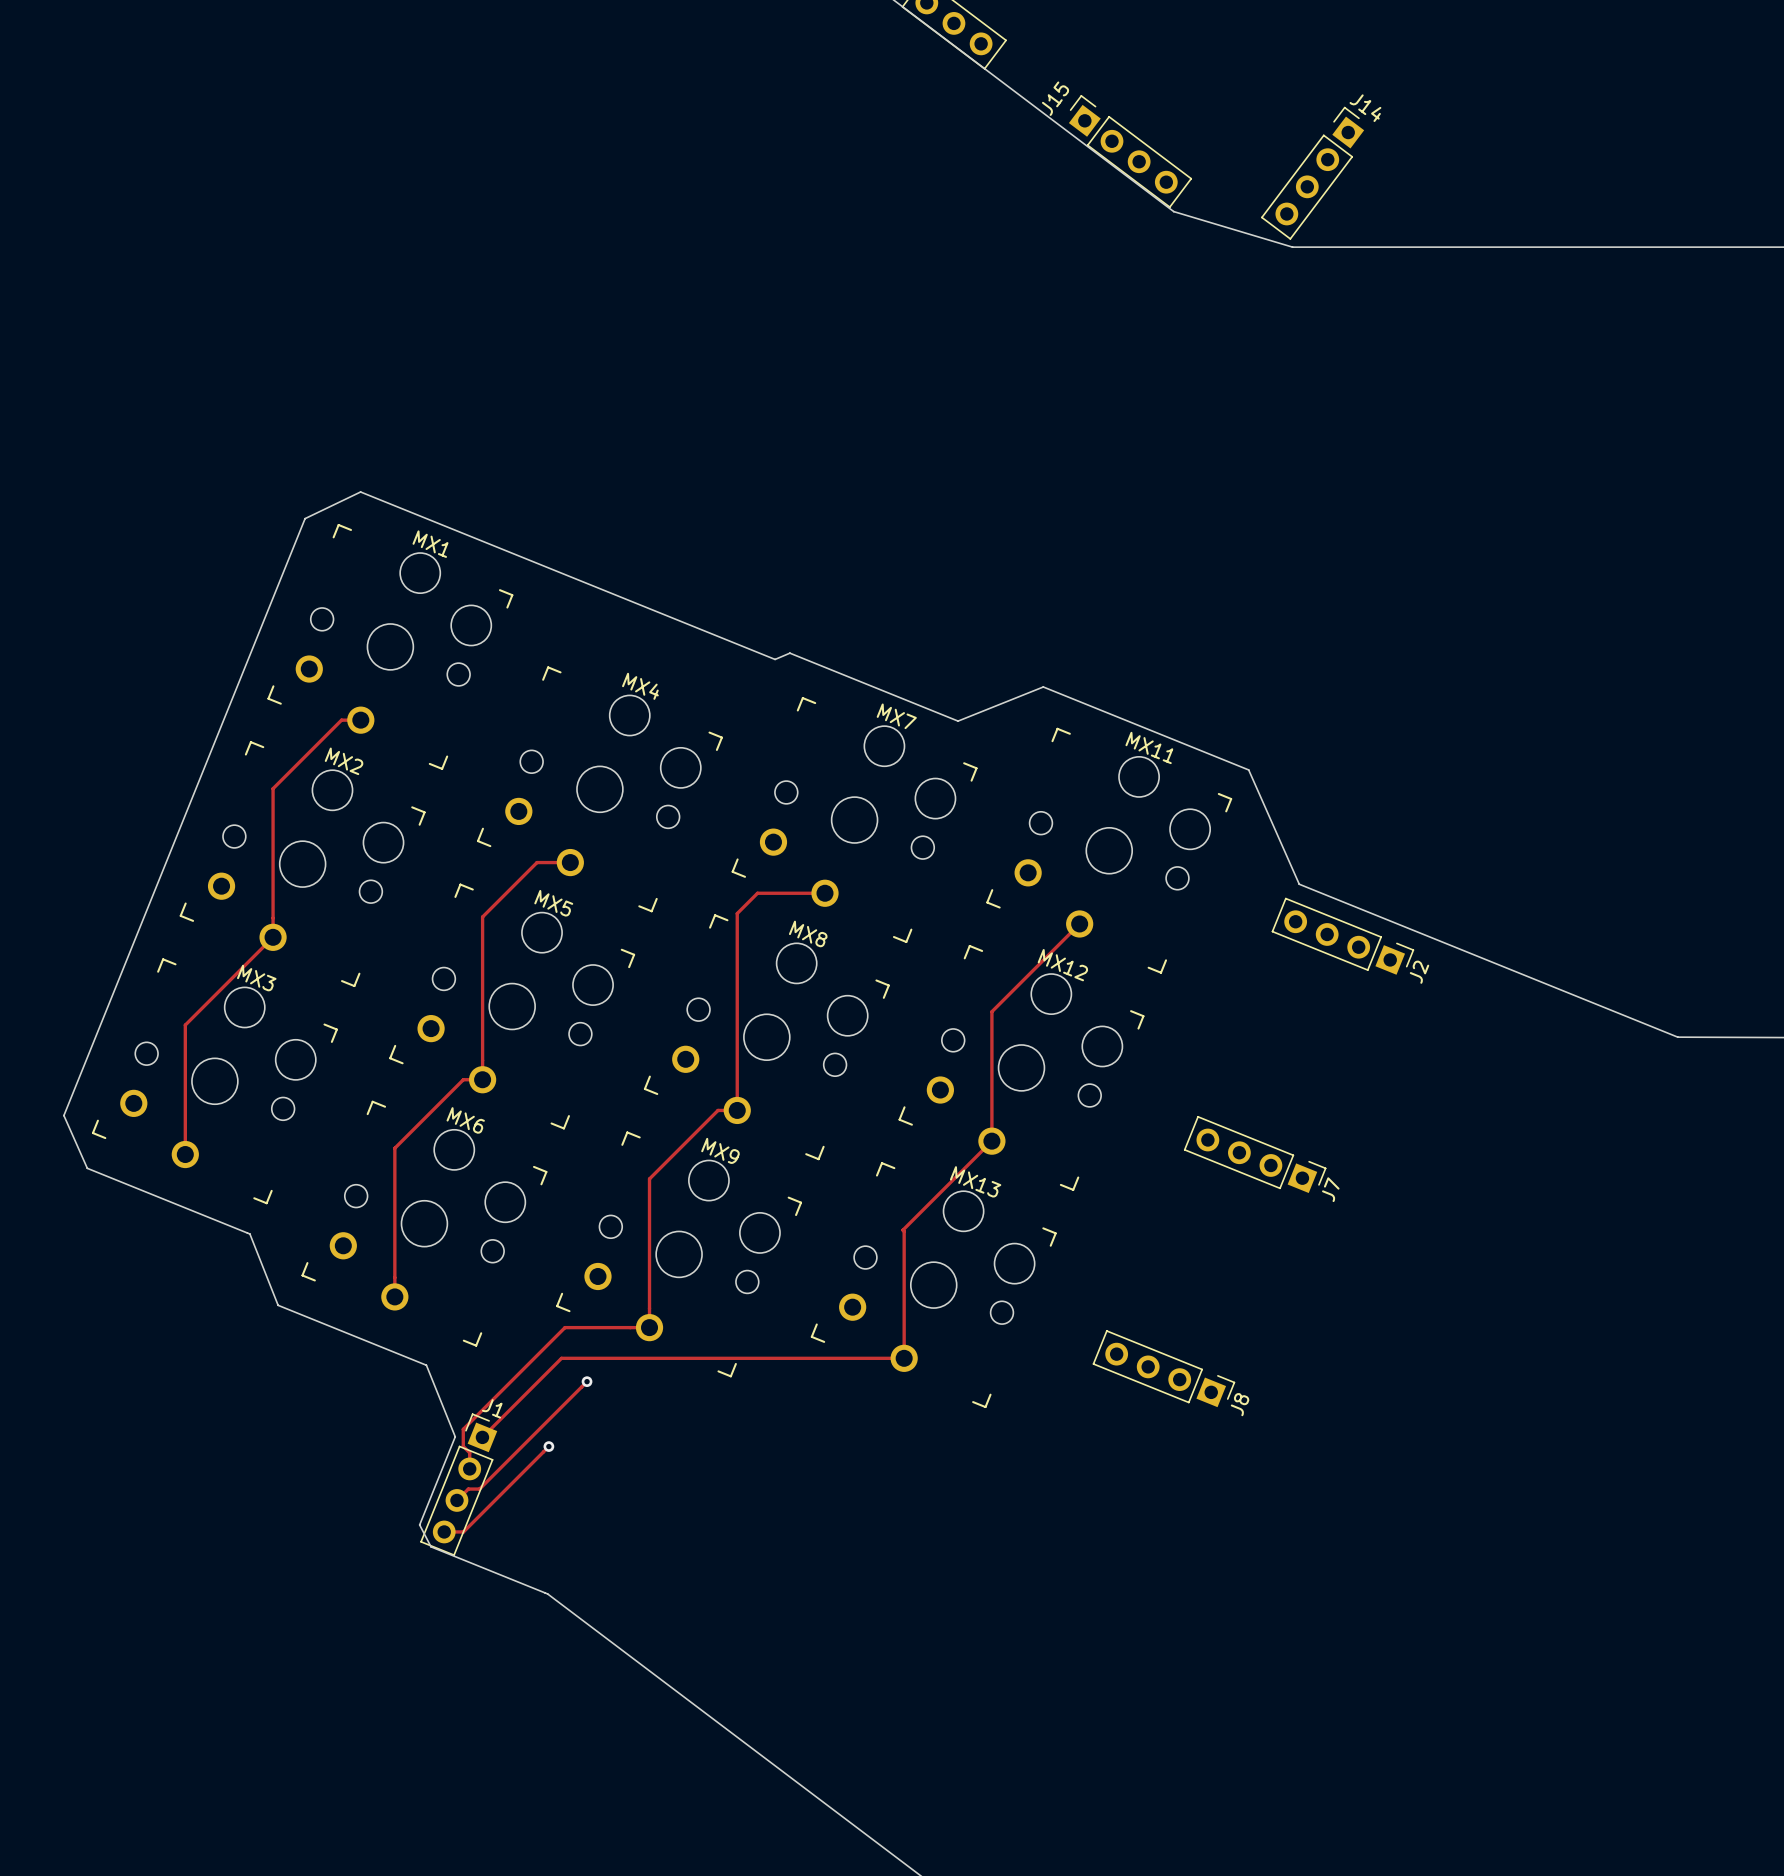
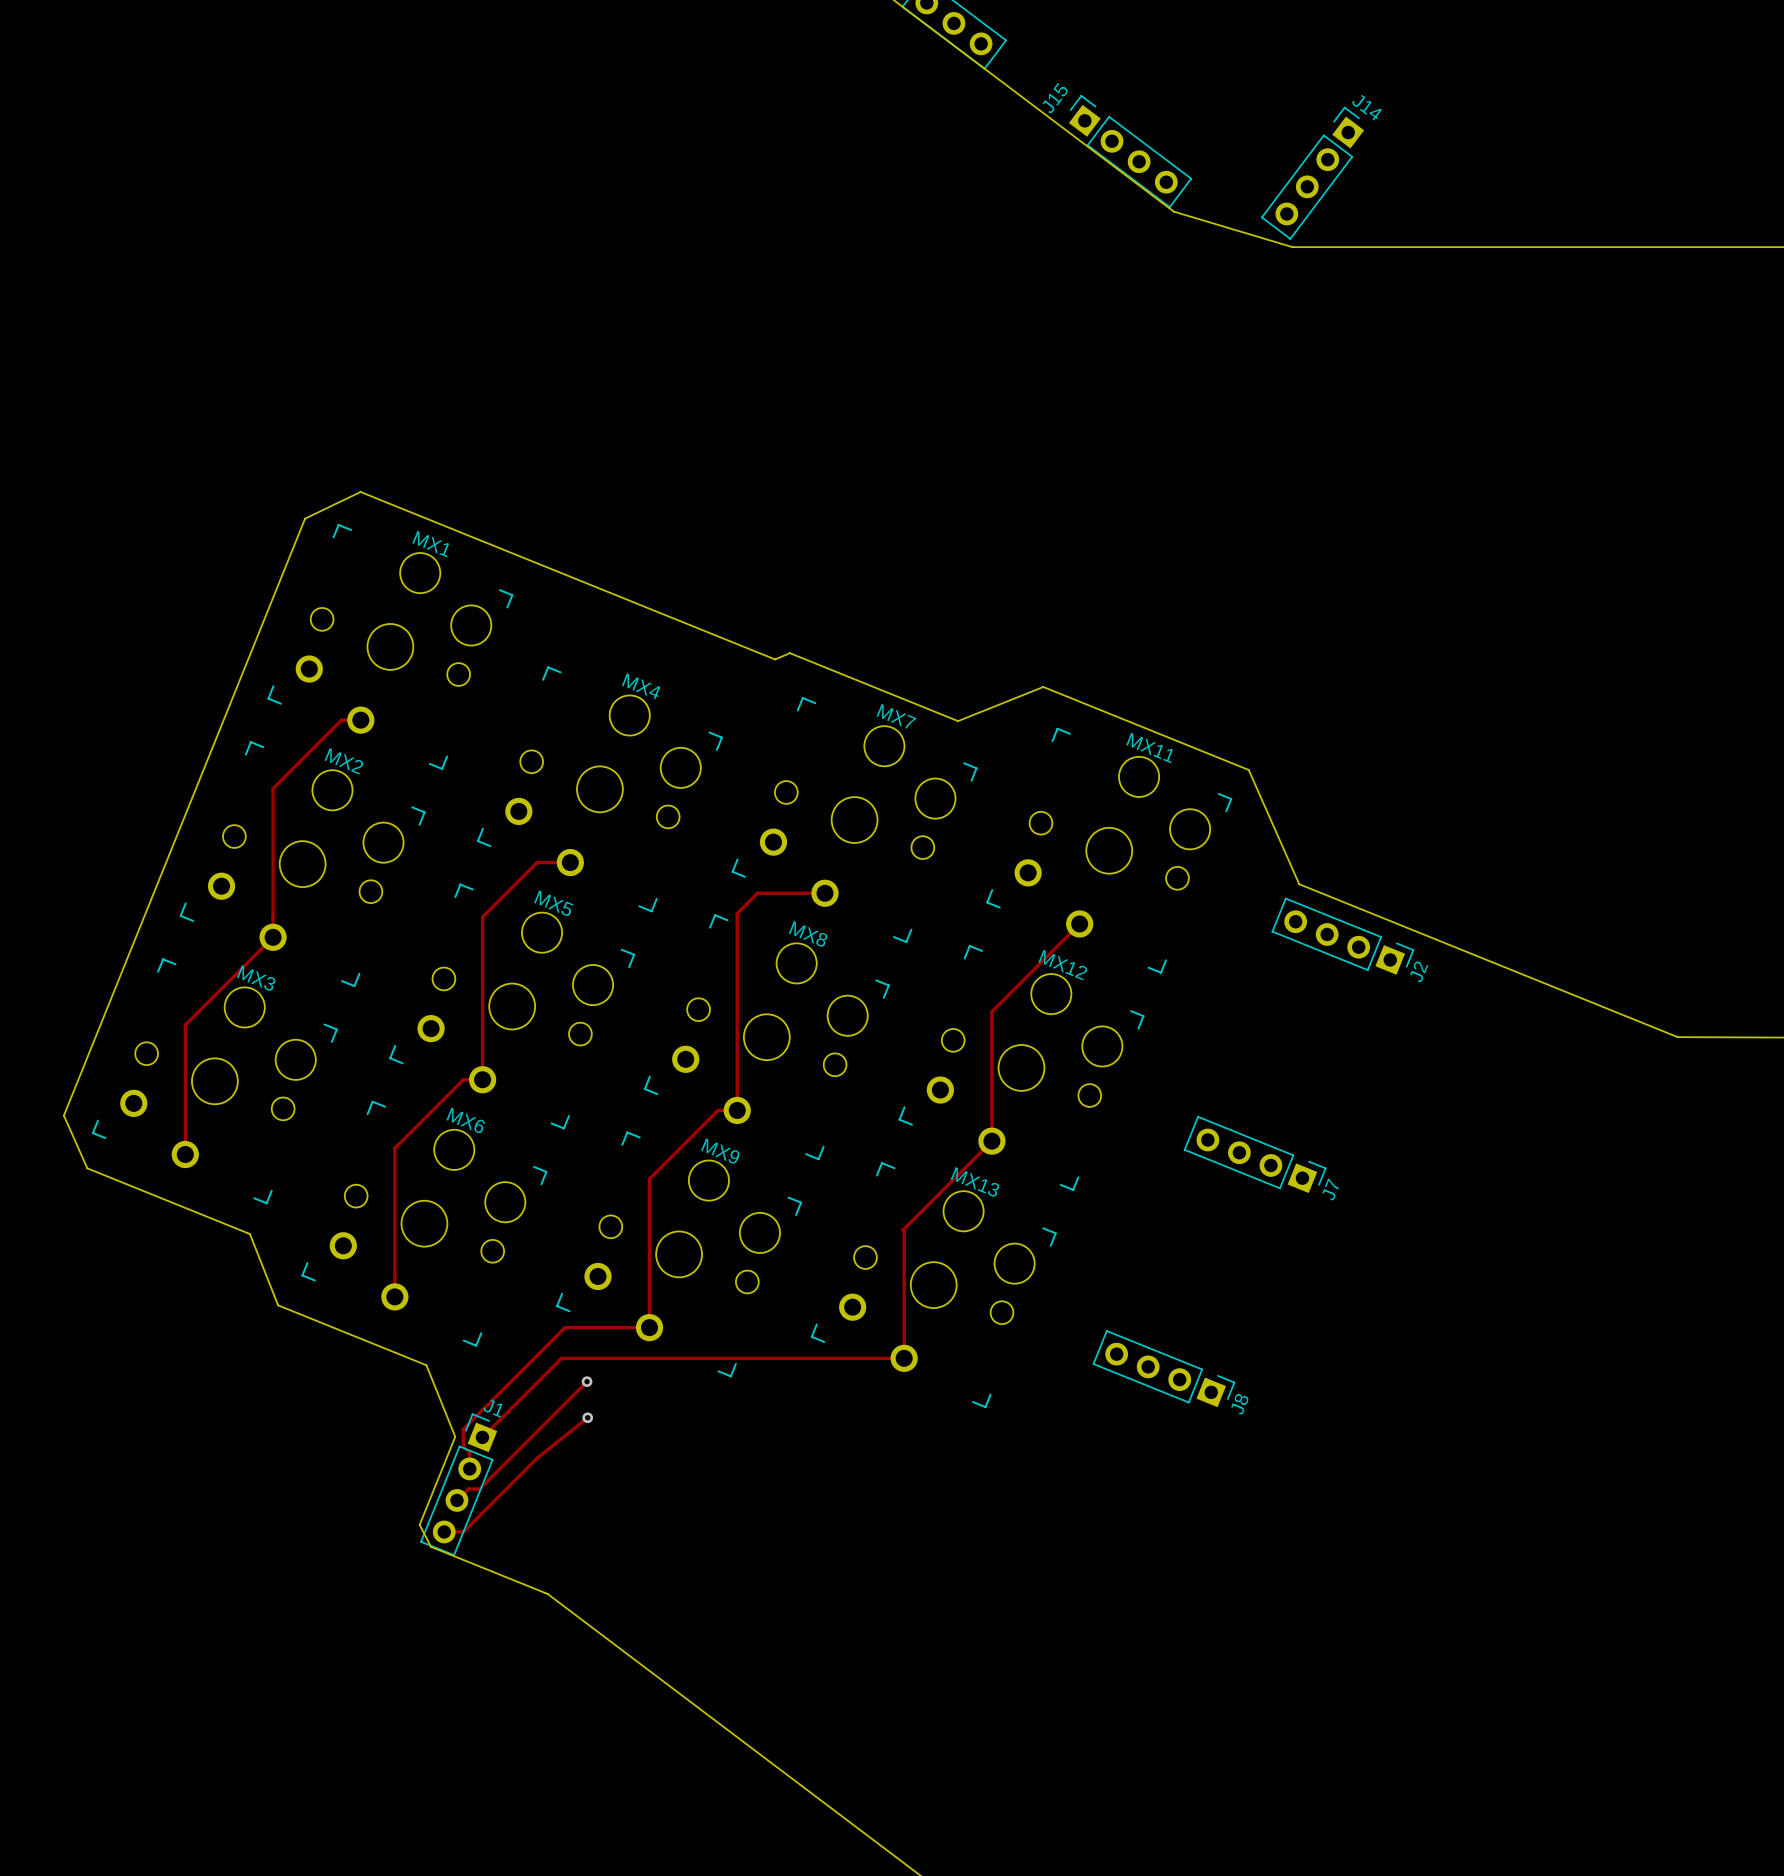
track: (548, 1446) (537, 1457) -> (587, 1417) (537, 1457)
via position: (548, 1446) -> (587, 1417)

